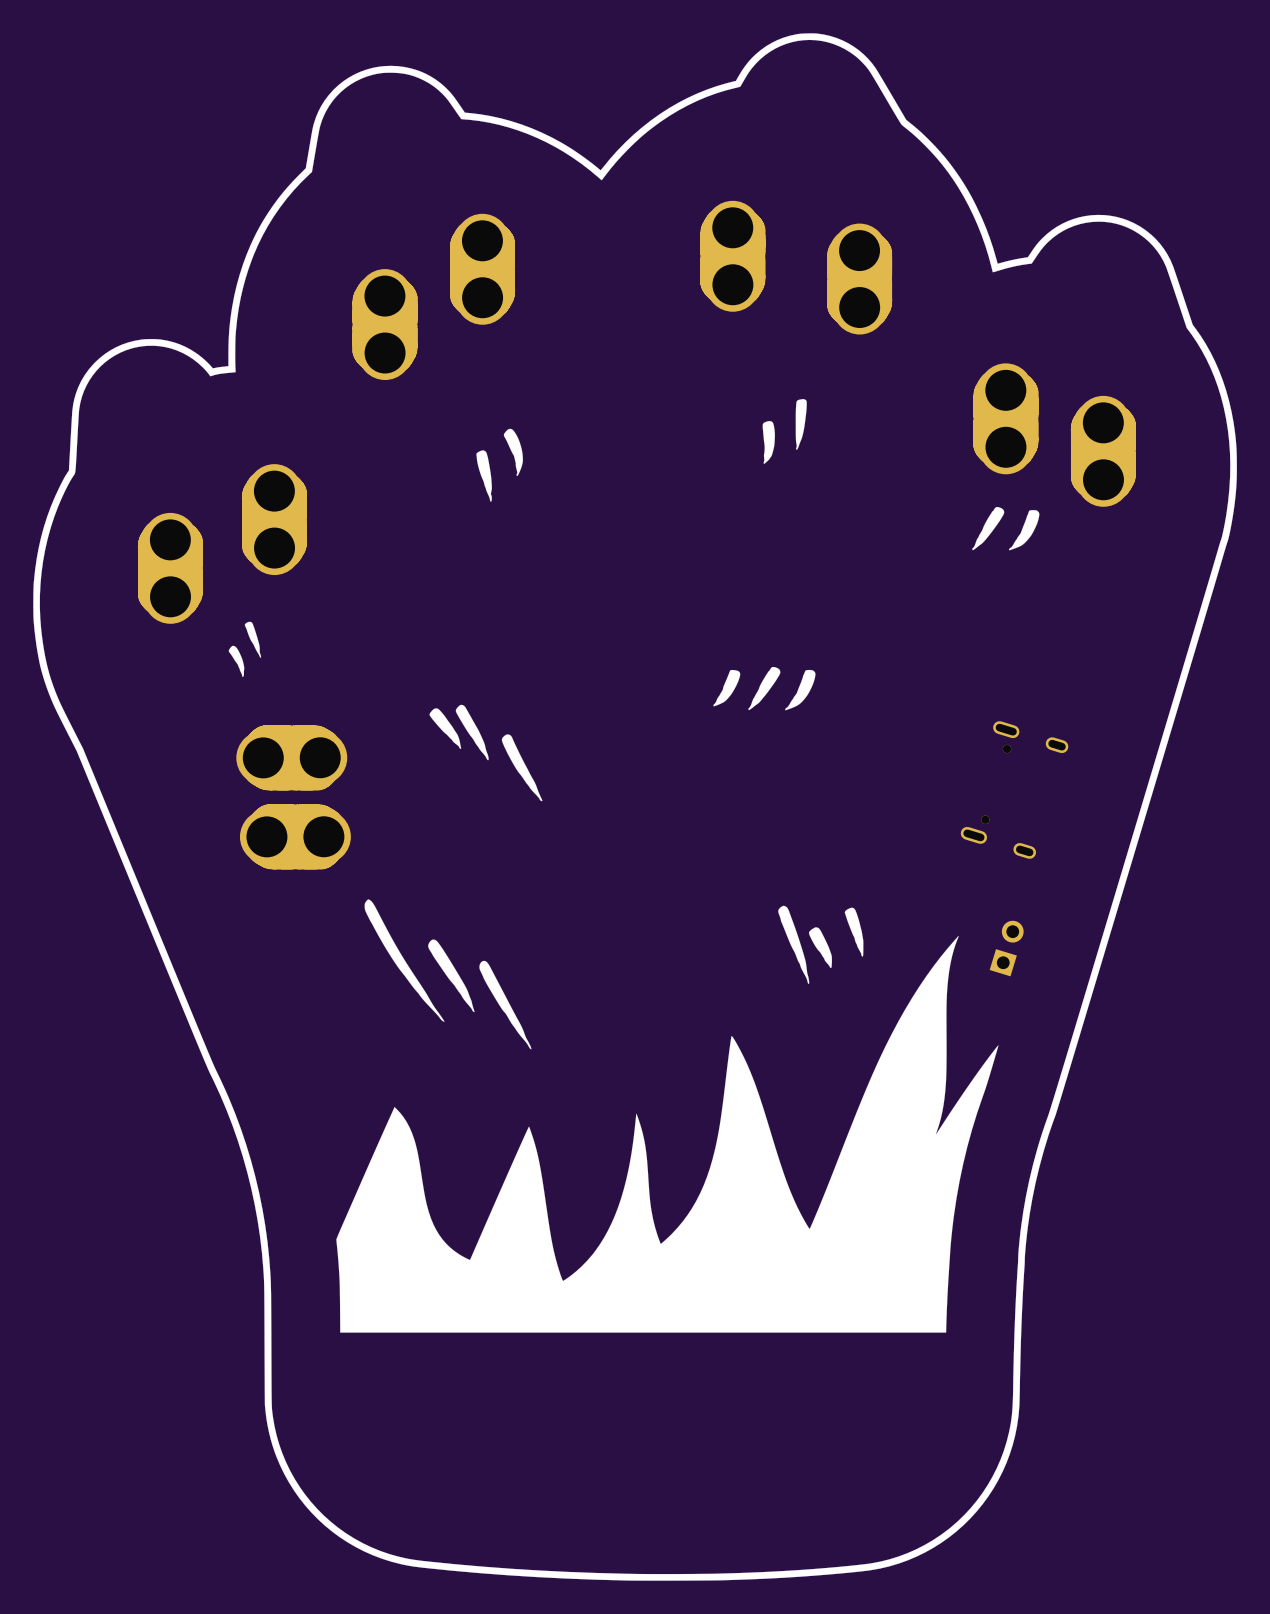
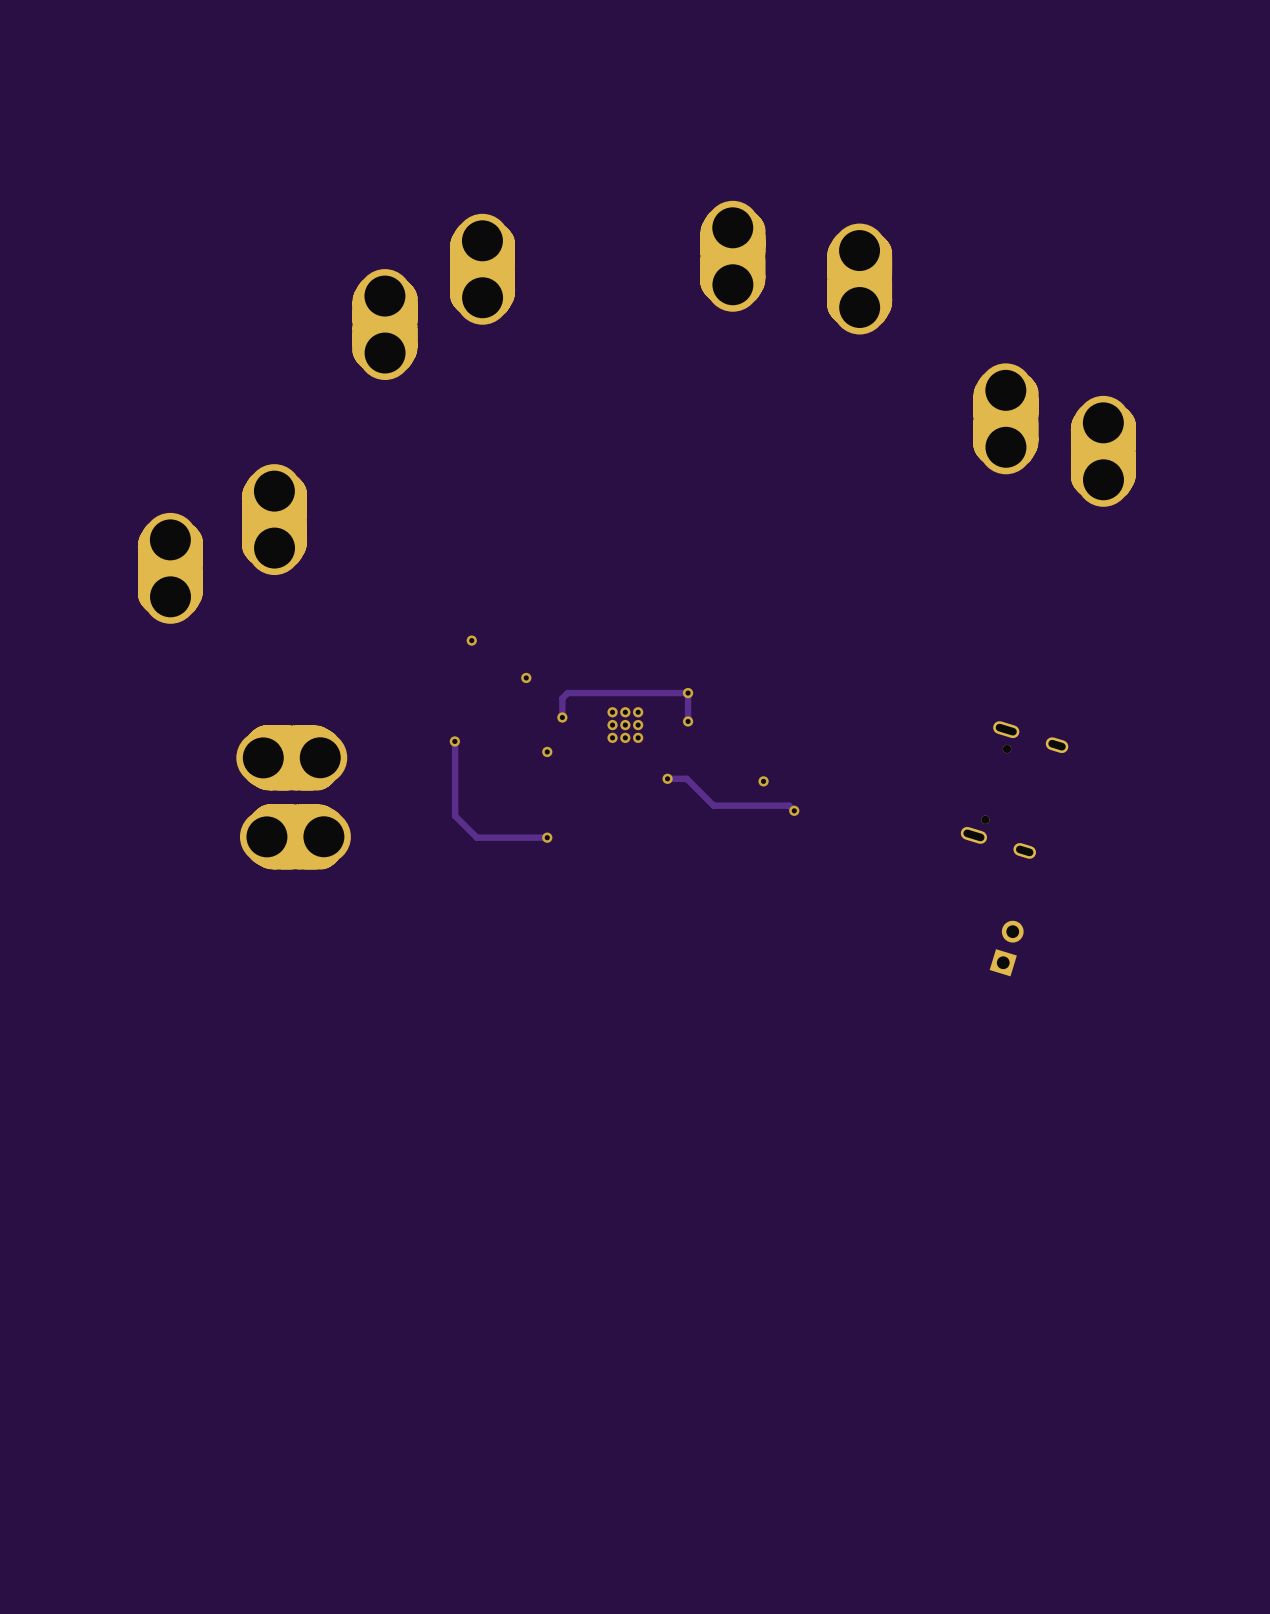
drawing: [33, 33, 1237, 1581] -> none
via: none -> (471, 640)
via: none -> (526, 677)
via: none -> (688, 693)
via: none -> (612, 712)
via: none -> (625, 712)
via: none -> (638, 712)
track: none -> (562, 717) (562, 698) (567, 693) (688, 693) (688, 721)
via: none -> (562, 717)
via: none -> (688, 721)
via: none -> (612, 725)
via: none -> (625, 725)
via: none -> (638, 725)
via: none -> (612, 737)
via: none -> (625, 737)
via: none -> (638, 737)
track: none -> (454, 741) (455, 815) (476, 837) (547, 837)
via: none -> (454, 741)
via: none -> (547, 751)
track: none -> (667, 778) (686, 778) (713, 805) (789, 805) (794, 810)
via: none -> (667, 778)
via: none -> (763, 781)
via: none -> (794, 810)
via: none -> (547, 837)

